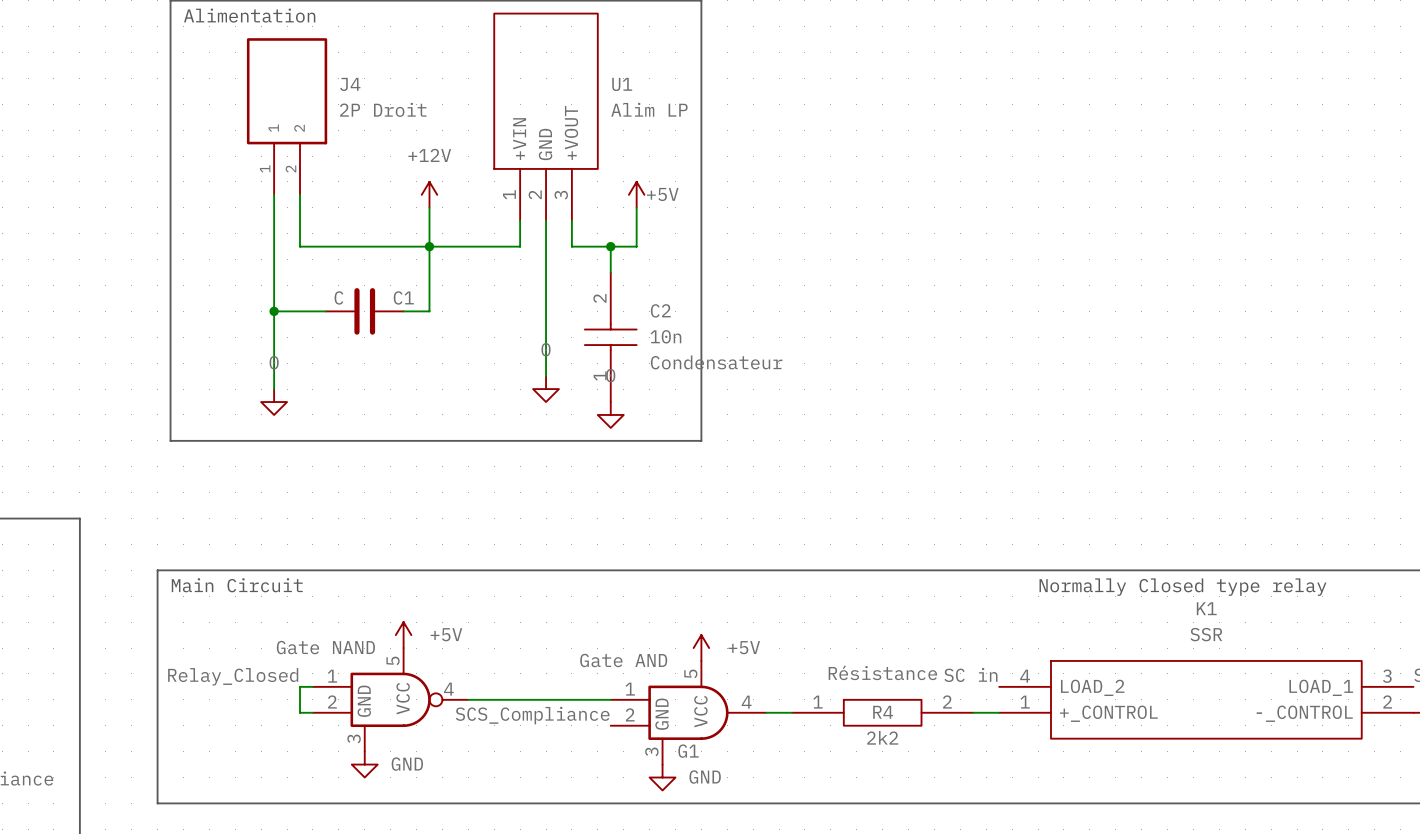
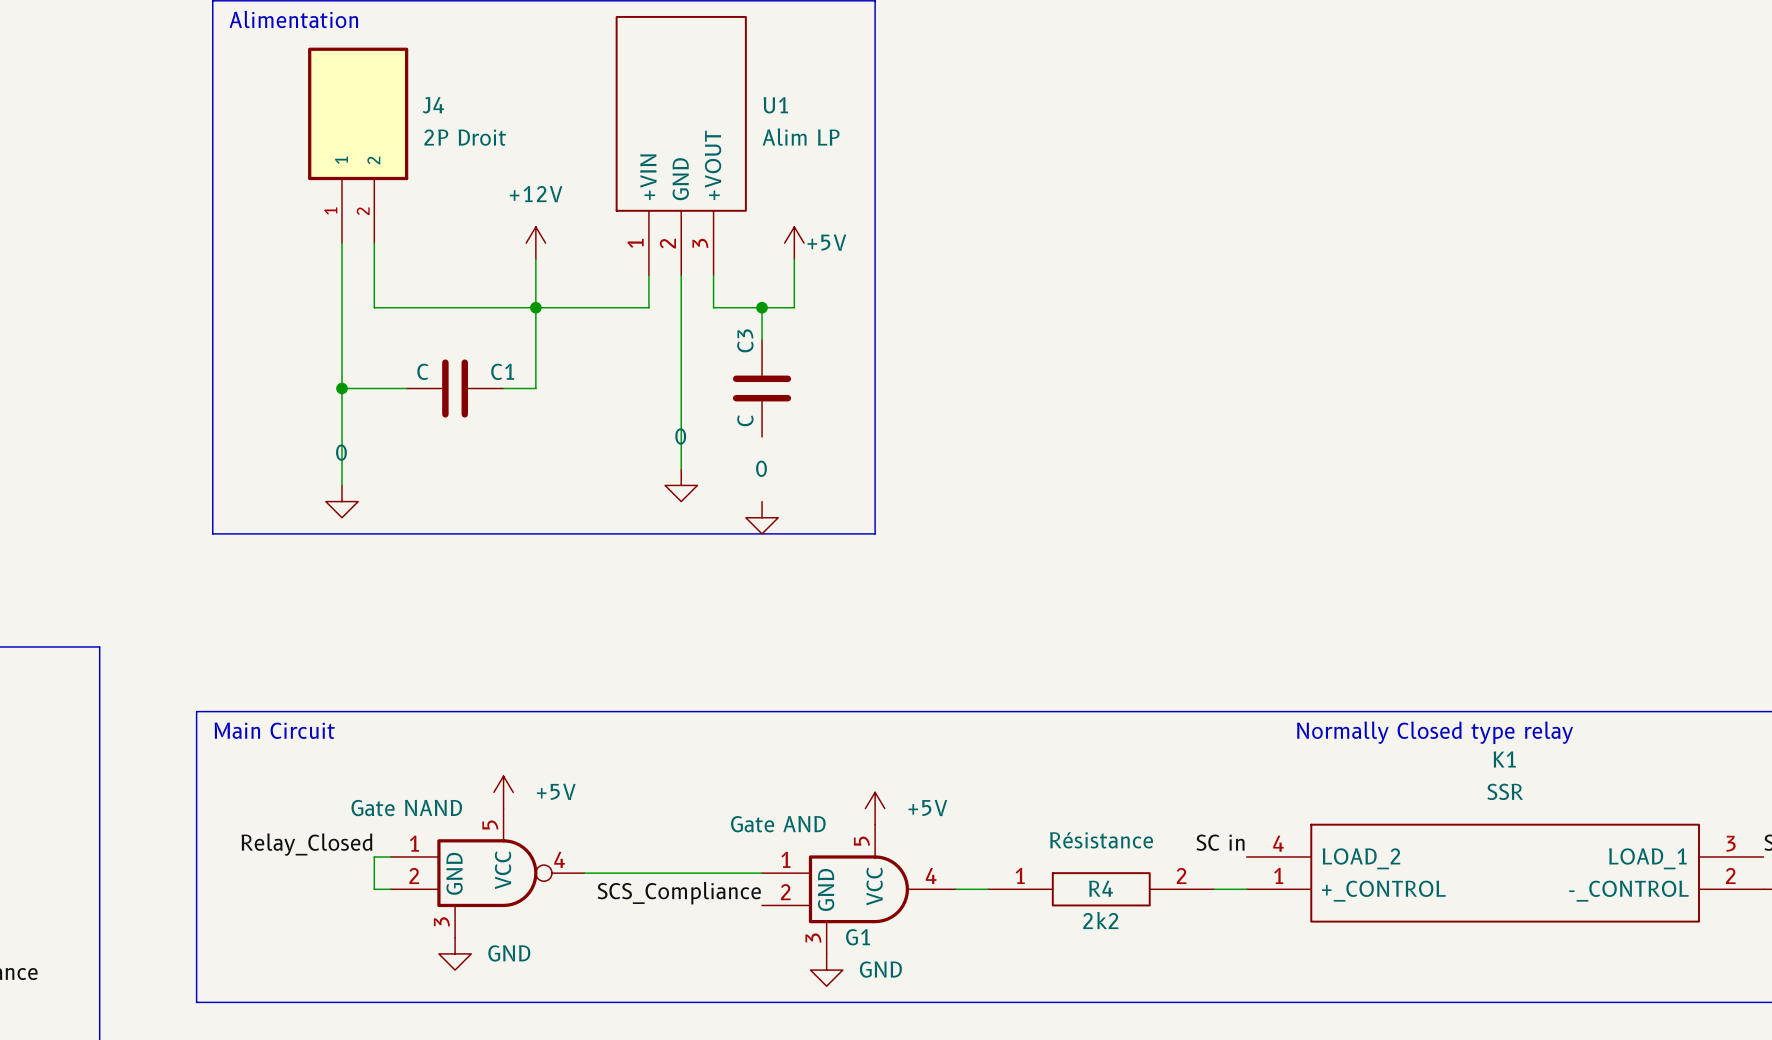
C3: none -> C (762, 388)
C2: 10n (610, 337) -> none
line: (170, 427) (170, 440) (701, 440) (701, 427) -> (212, 533) (875, 533)

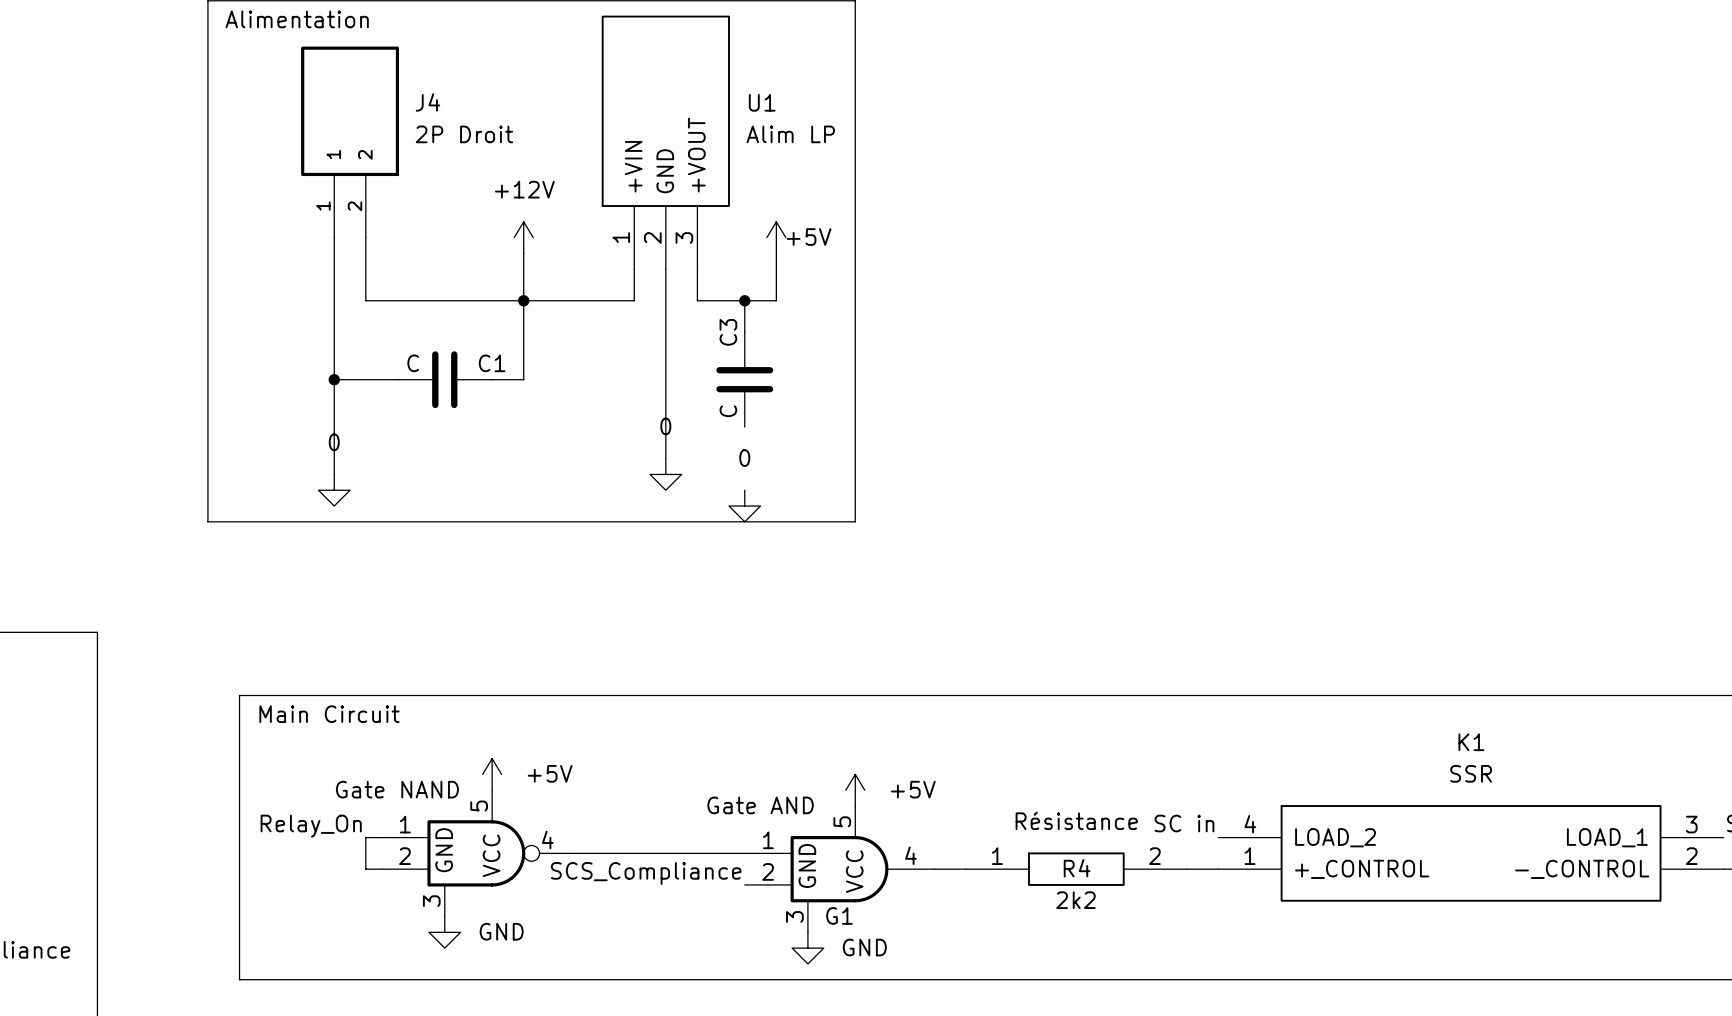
line: (245, 711) (196, 711) (196, 1002) (245, 1002) -> (239, 695) (239, 979)
text position: Main Circuit (274, 730) -> Main Circuit (329, 714)
text: Normally Closed type relay (1434, 732) -> none
label: Relay_Closed (306, 844) -> Relay_On (311, 826)

